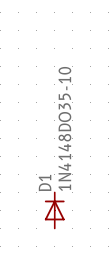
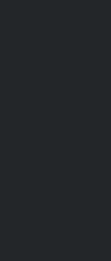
D1: 1N4148DO35-10 (54, 210) -> none

